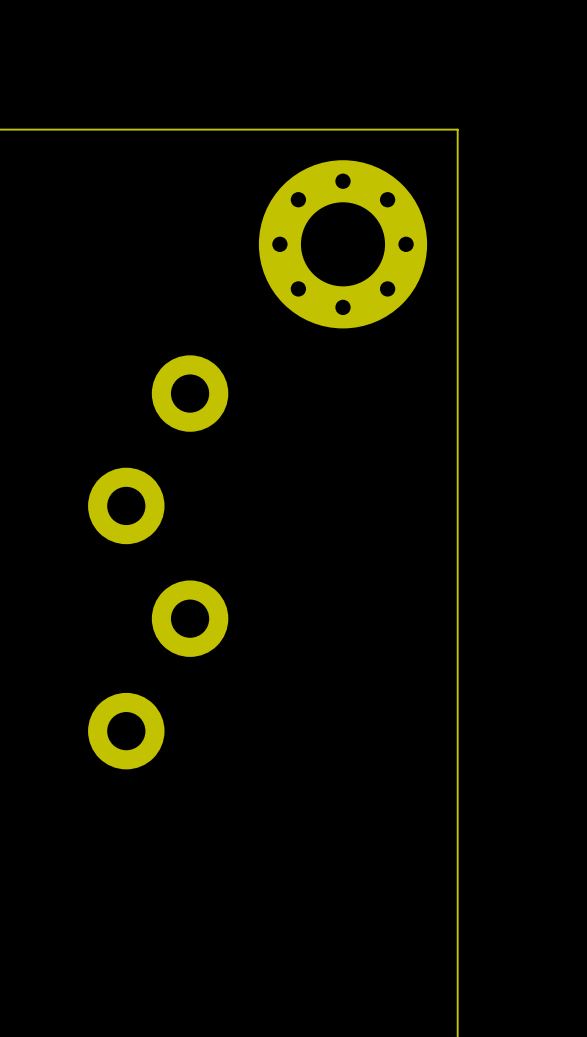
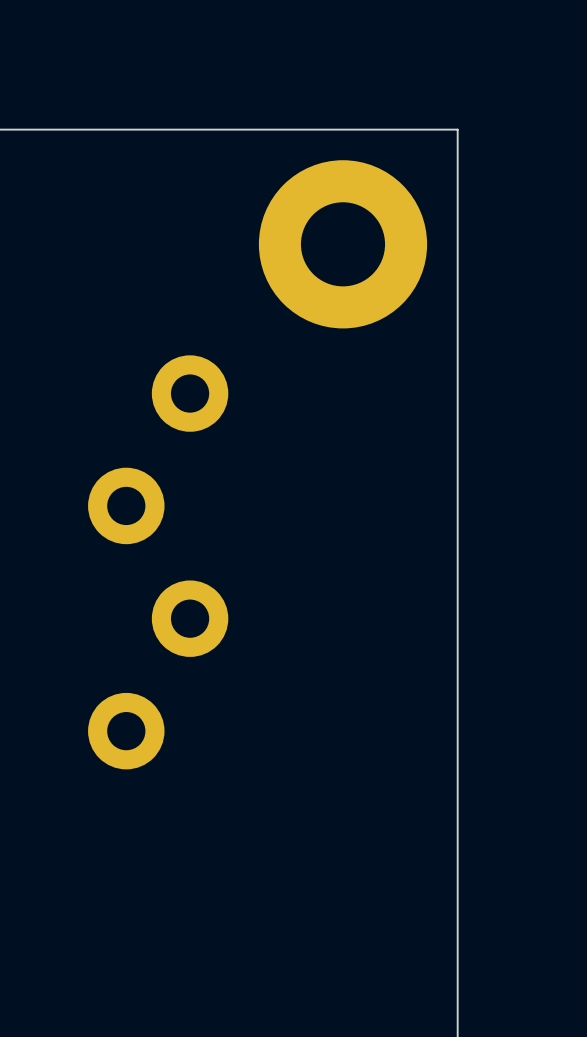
part footprint: [258, 160, 428, 329] -> [258, 160, 428, 329]

